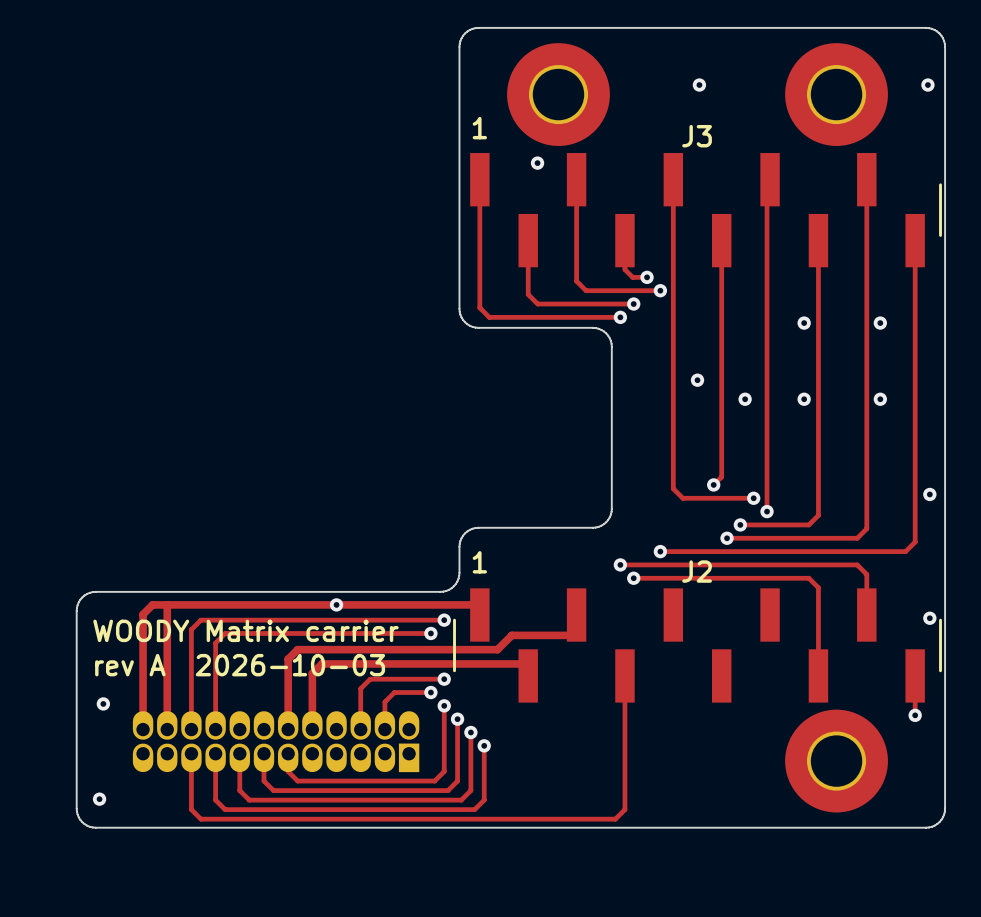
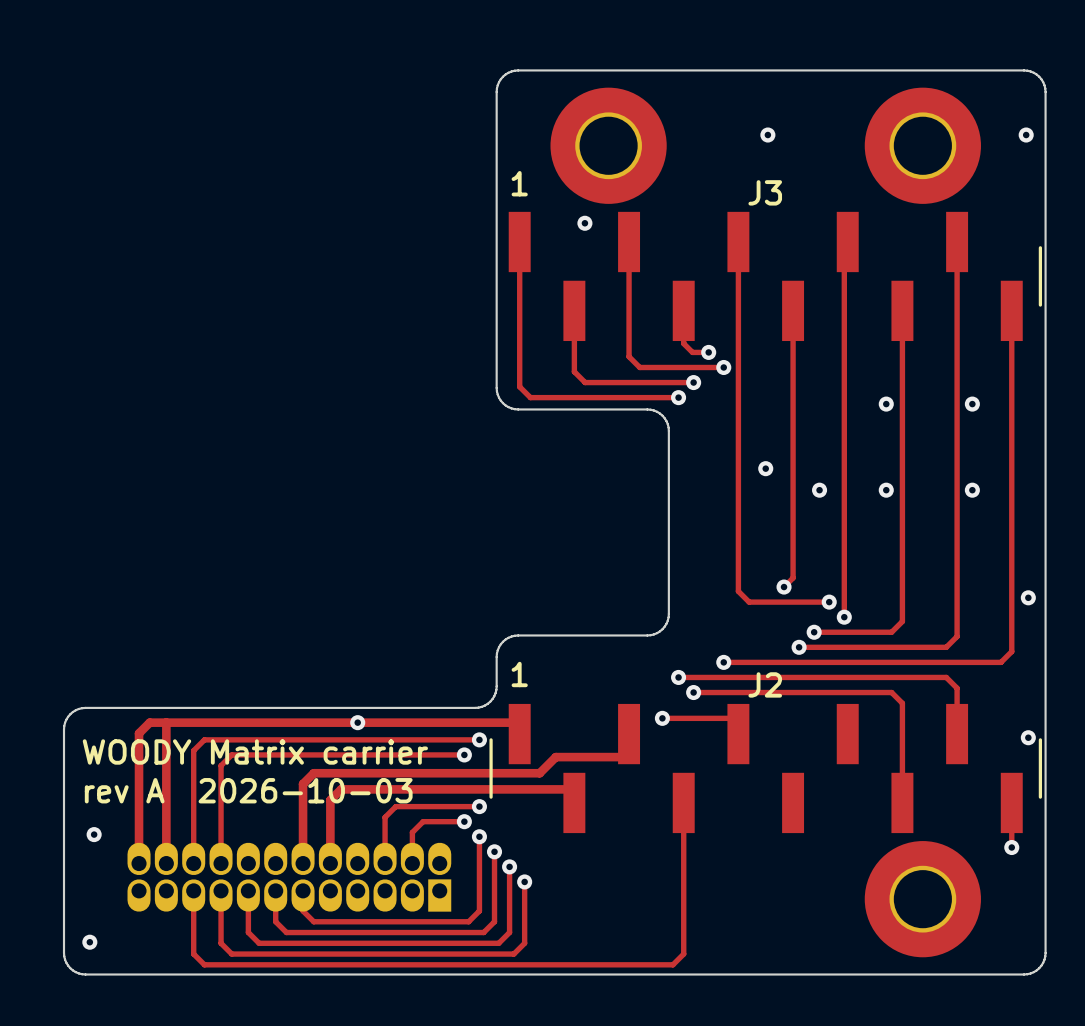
track: none -> (662, 718) (738, 718)
via: none -> (662, 718)

